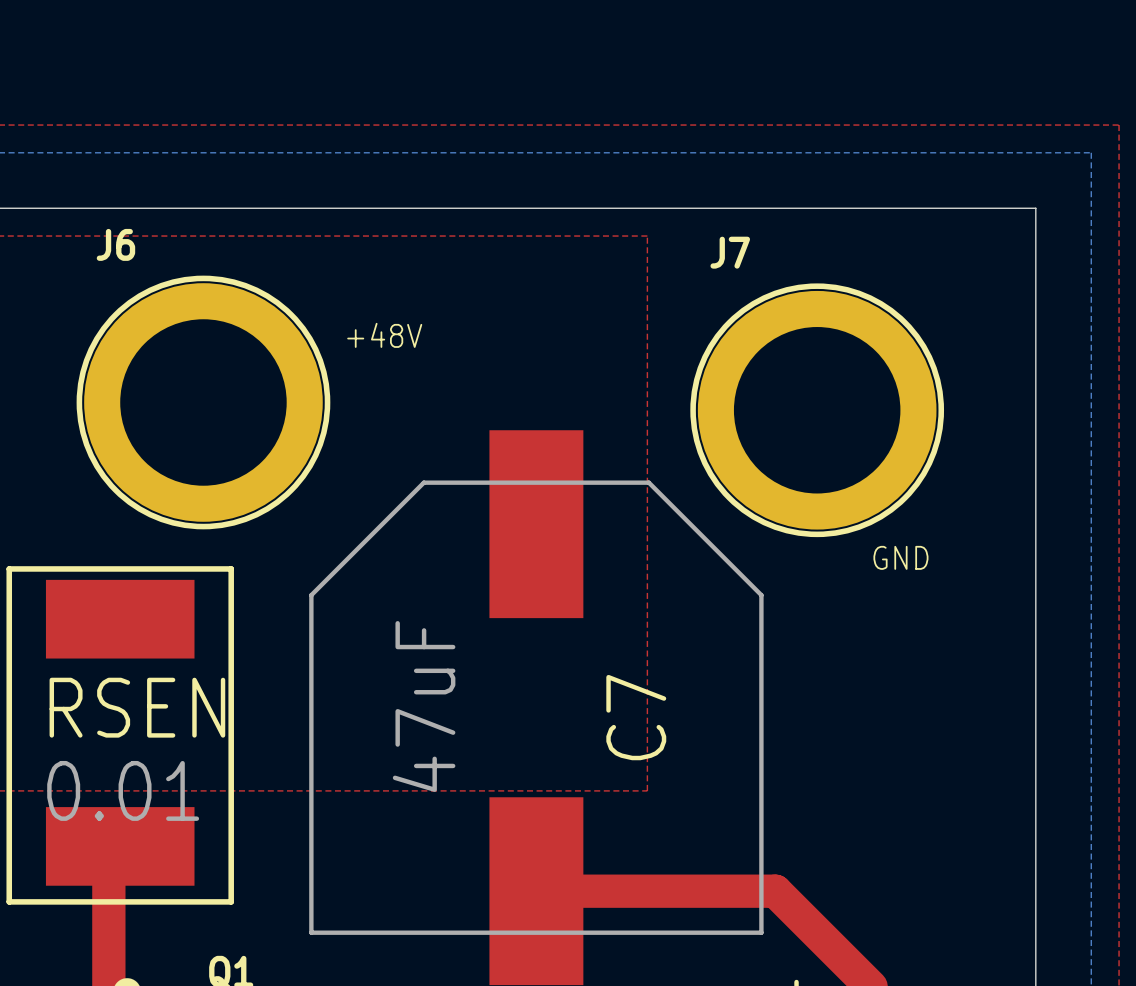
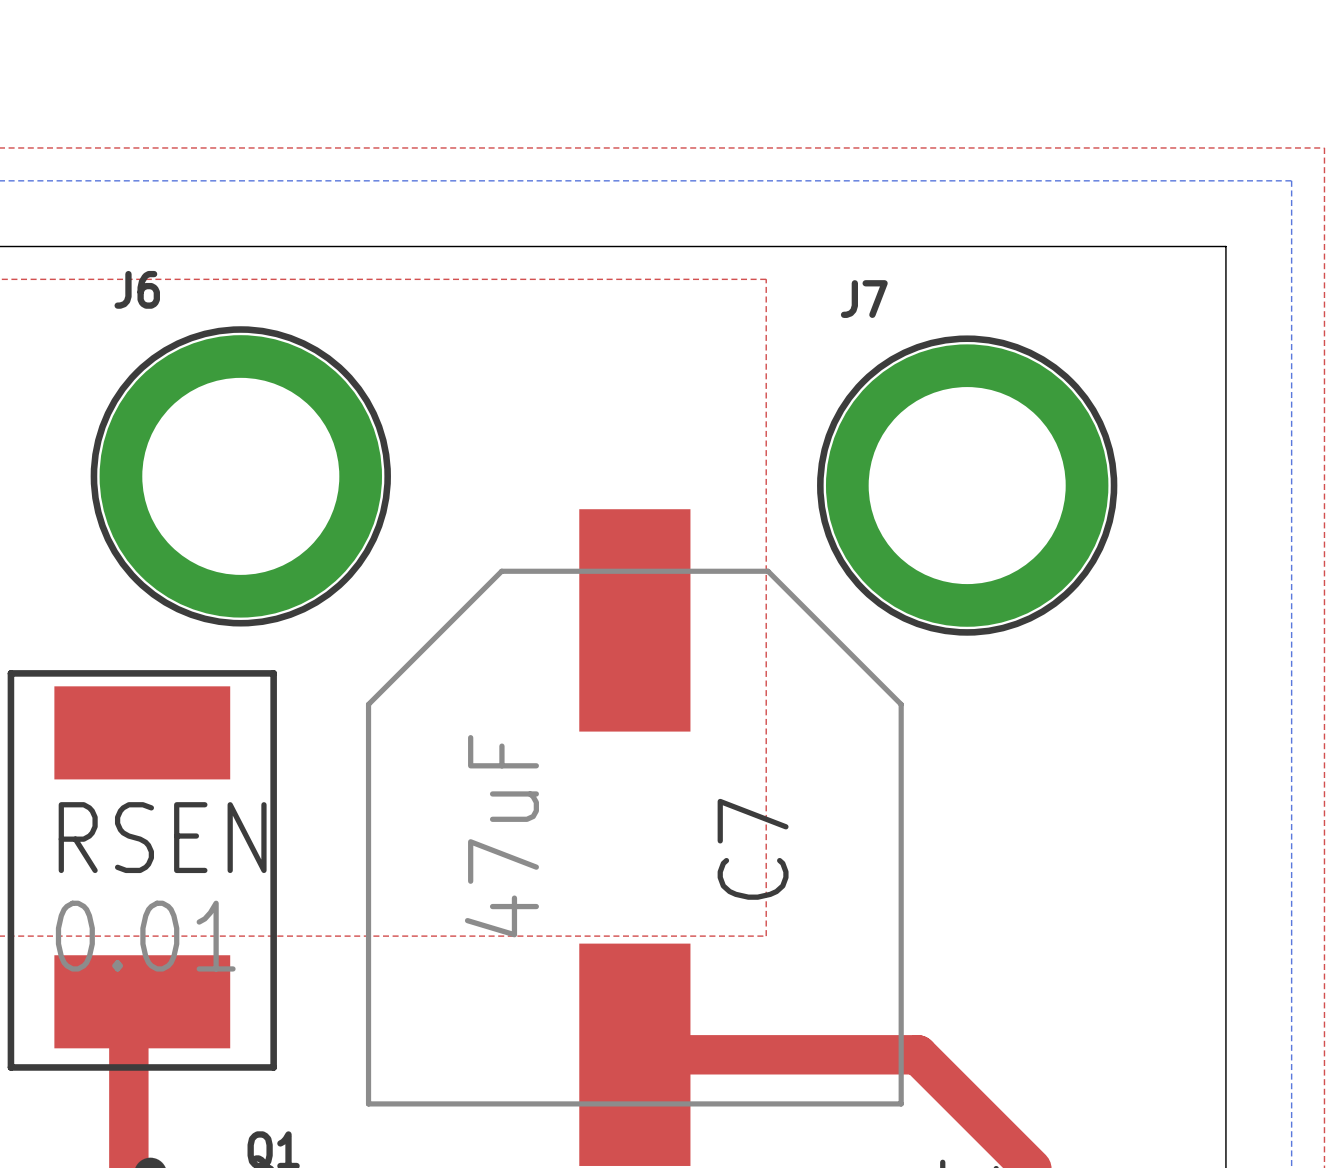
text: +48V (384, 335) -> none
text: GND (900, 557) -> none

